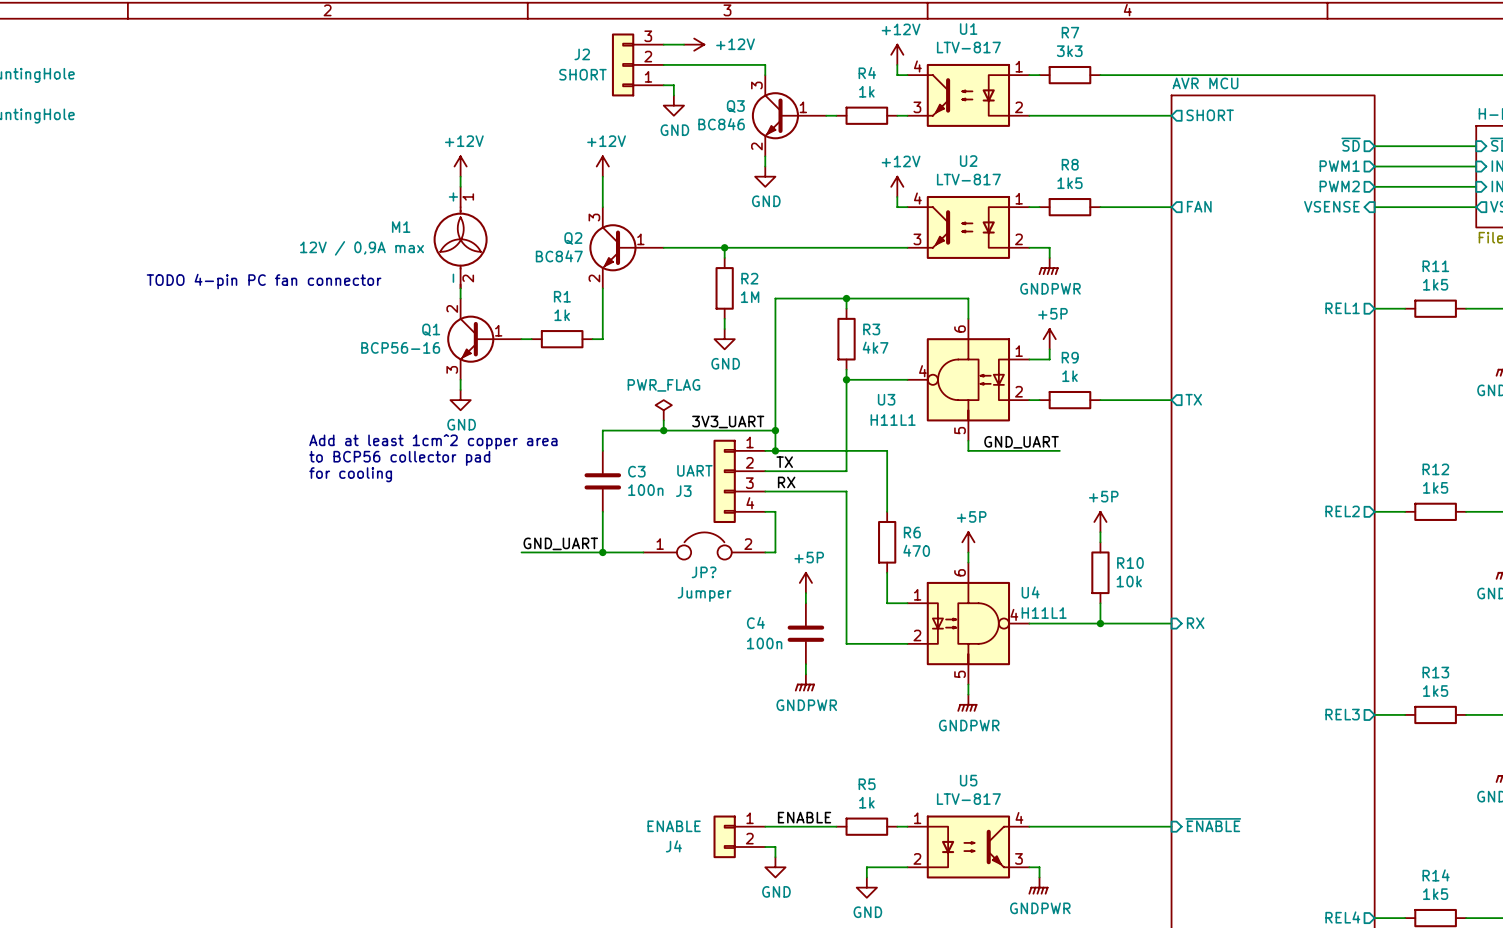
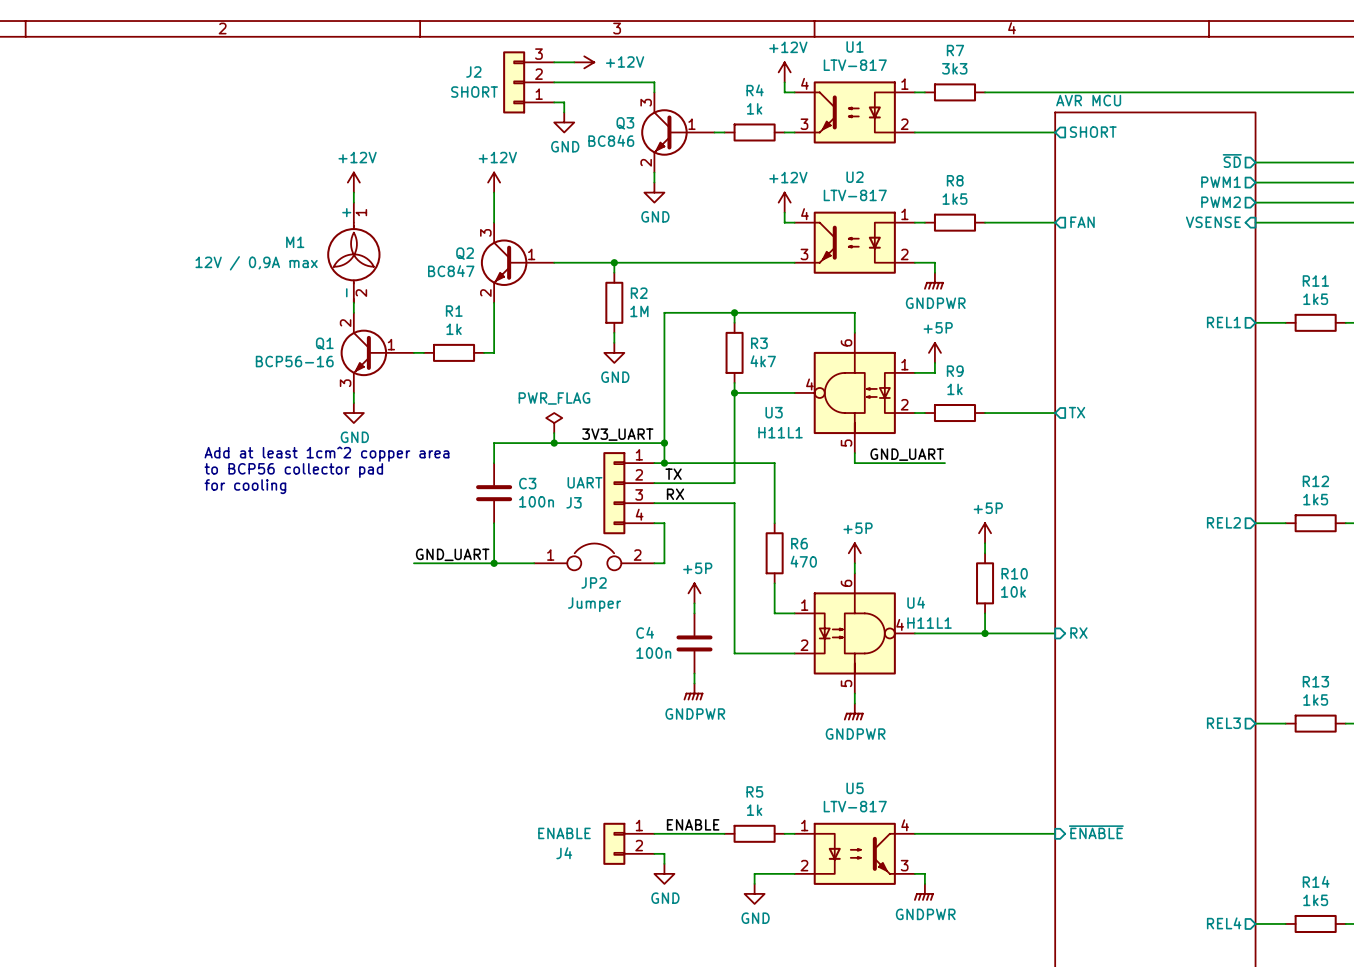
text: TODO 4-pin PC fan connector (264, 281) -> none
JP? name: JP? (704, 572) -> JP2 (594, 582)

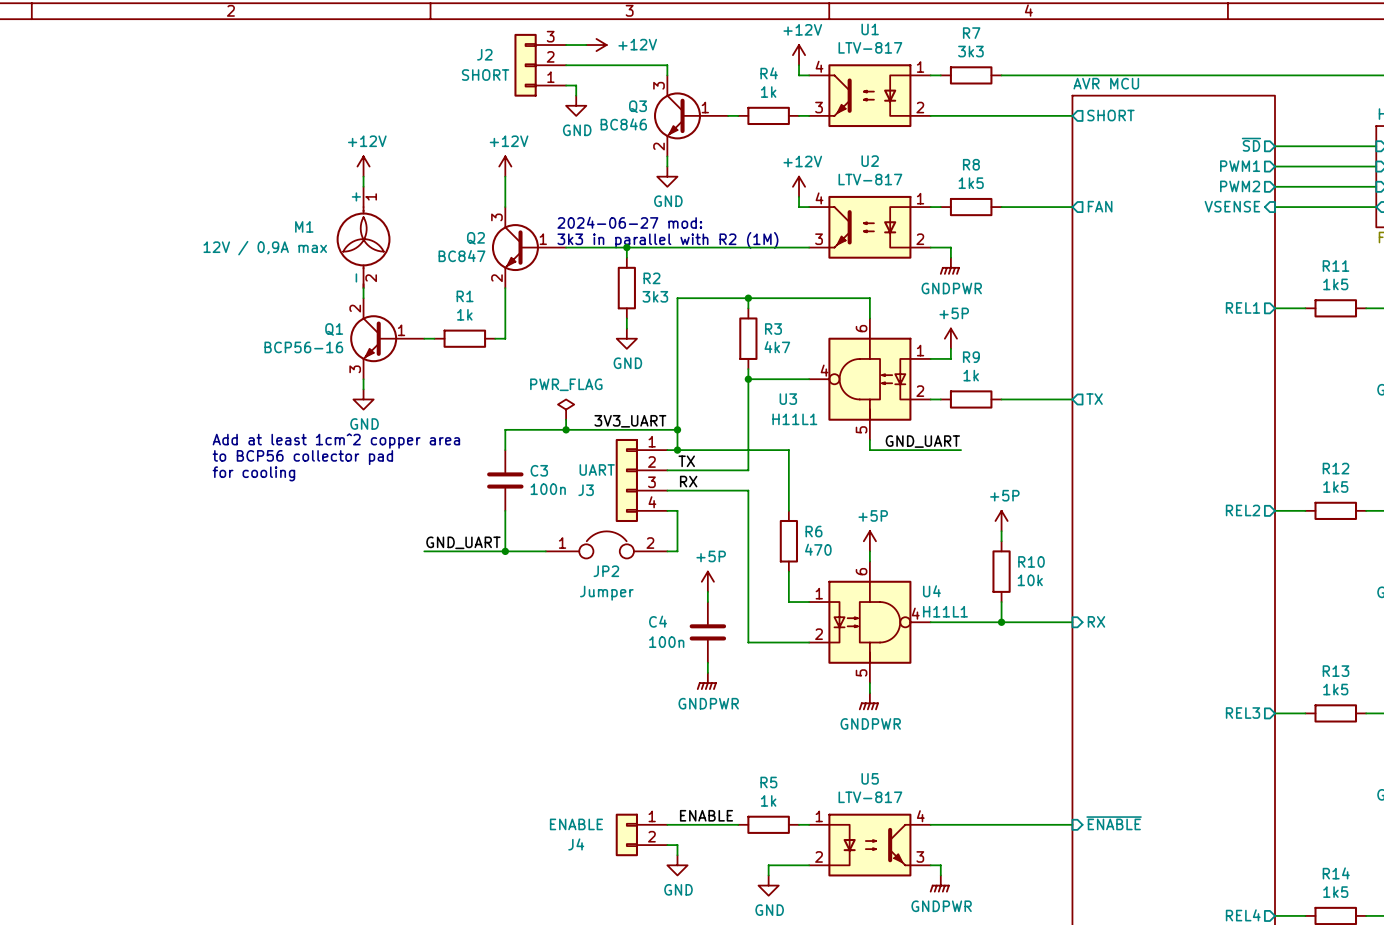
text: none -> 2024-06-27 mod: (629, 222)
text: none -> 3k3 in parallel with R2 (1M) (667, 240)
R2 value: 1M (639, 311) -> 3k3 (655, 296)

